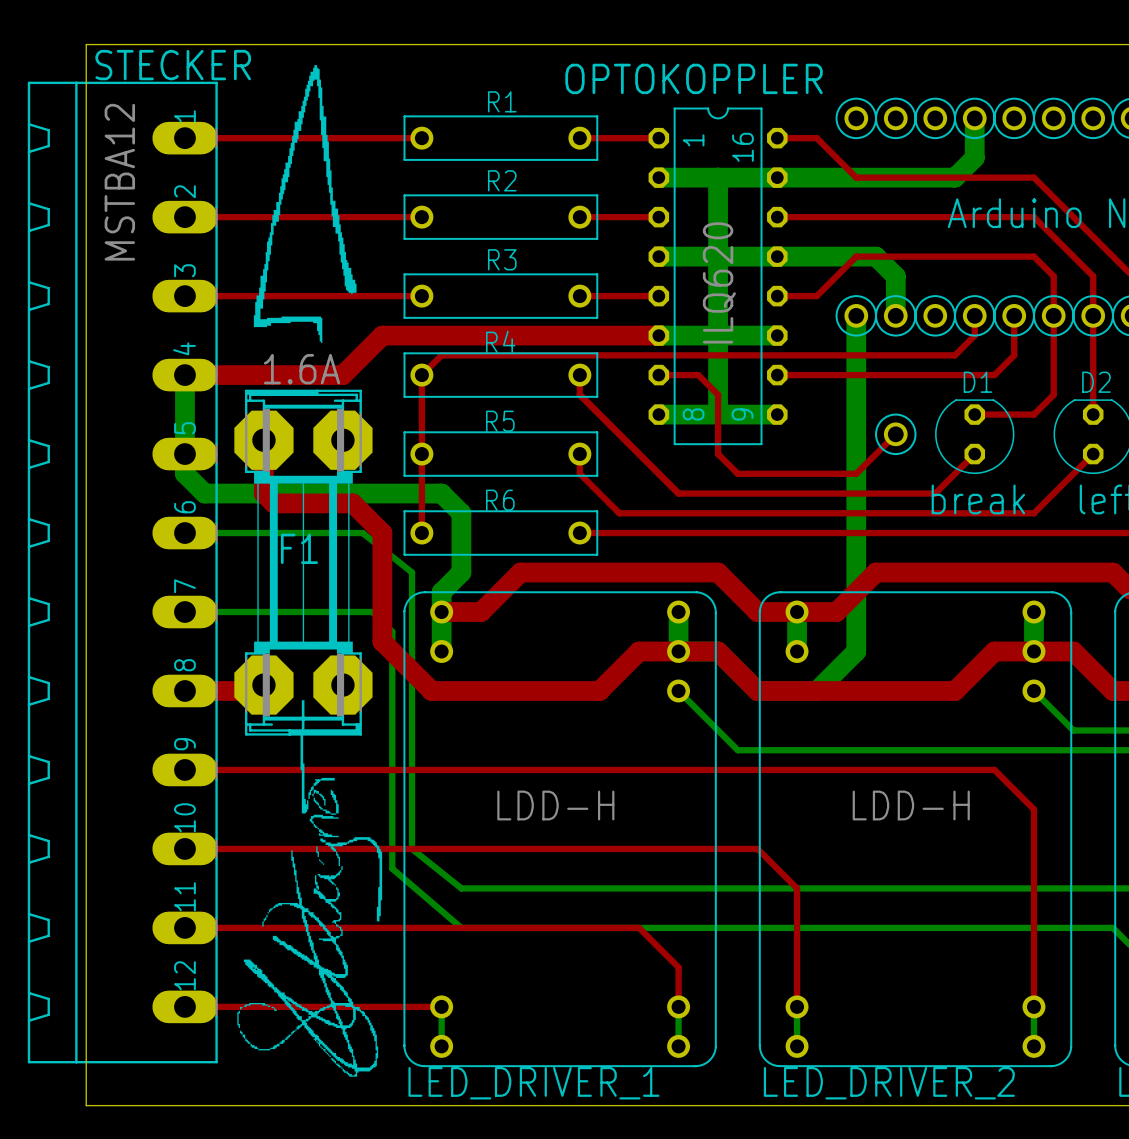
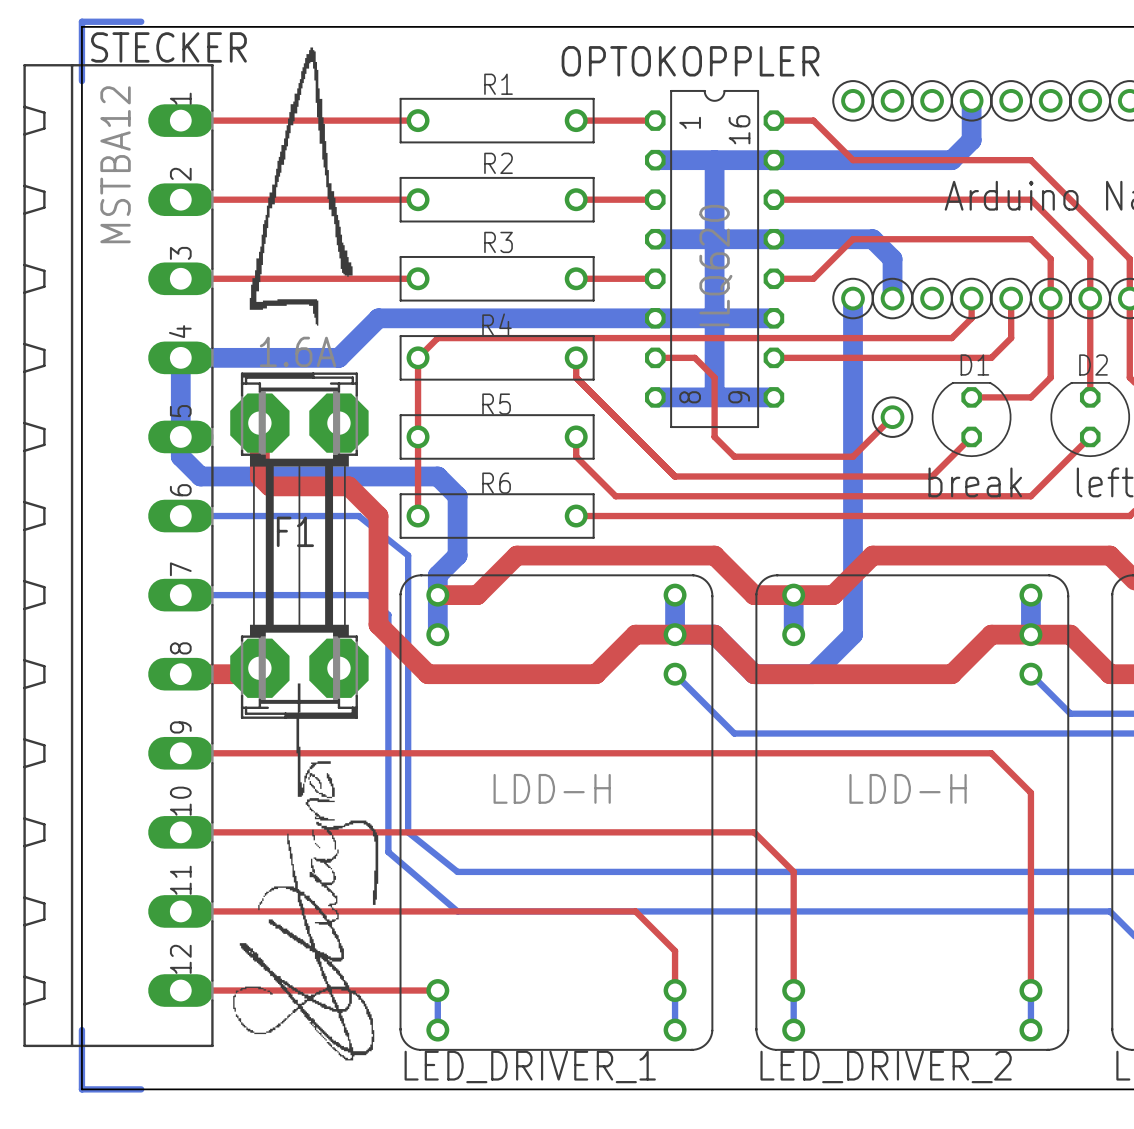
bottom track: none -> (141, 21) (81, 21) (81, 81)
bottom track: none -> (655, 318) (378, 318) (338, 357) (180, 357)
top track: (658, 335) (382, 335) (342, 375) (184, 375) -> none
bottom track: none -> (81, 1030) (81, 1089) (141, 1089)

